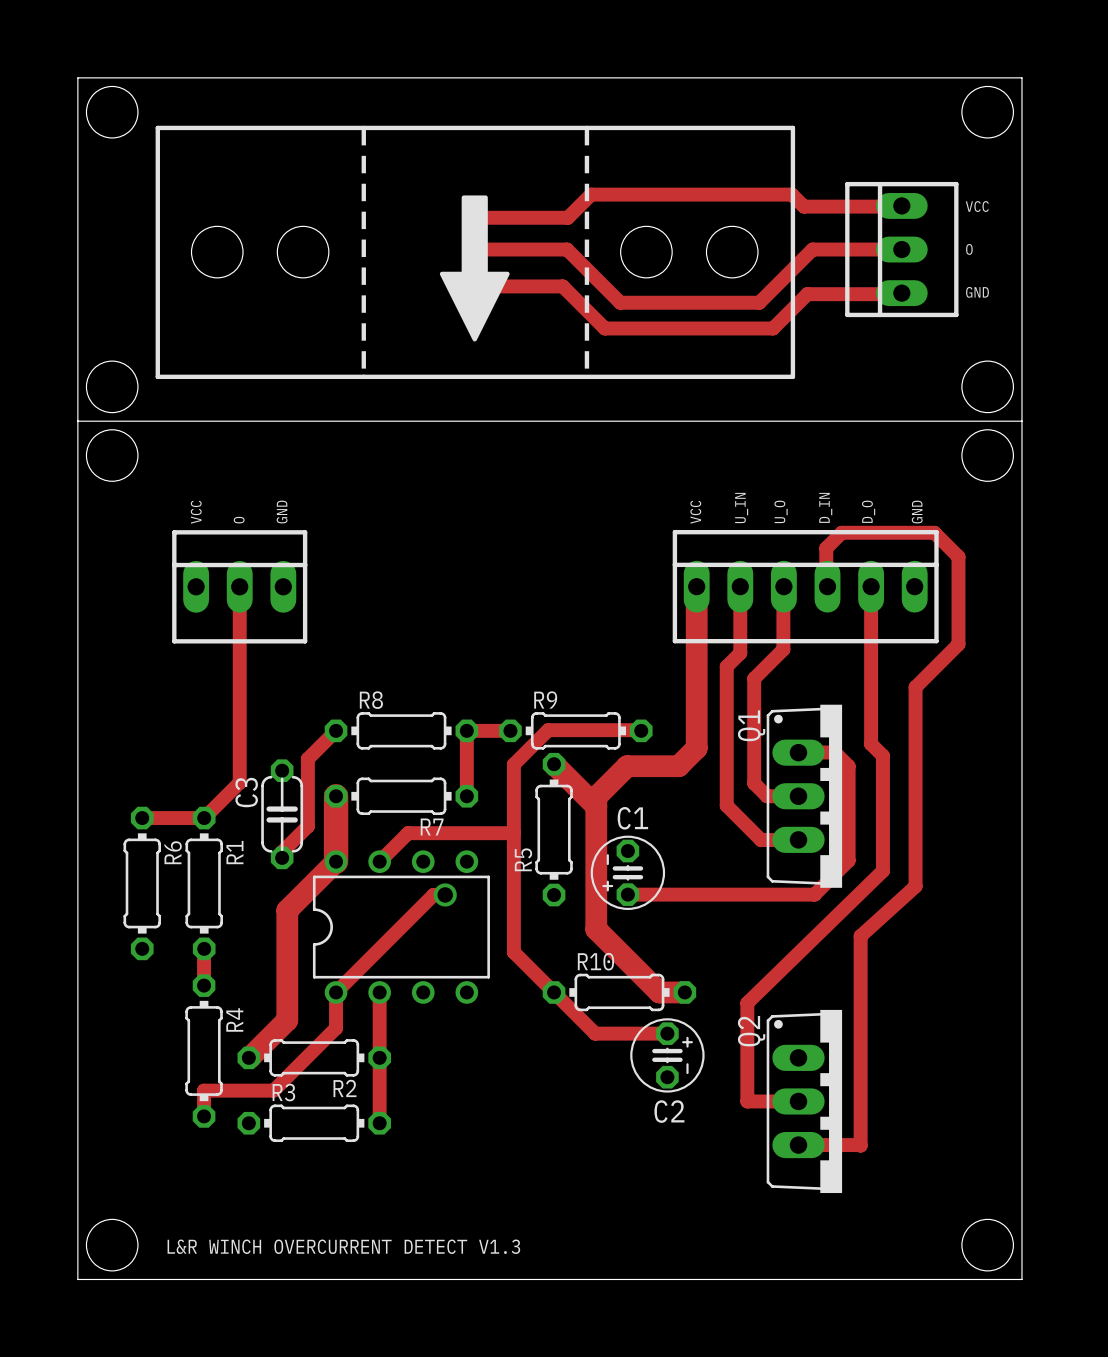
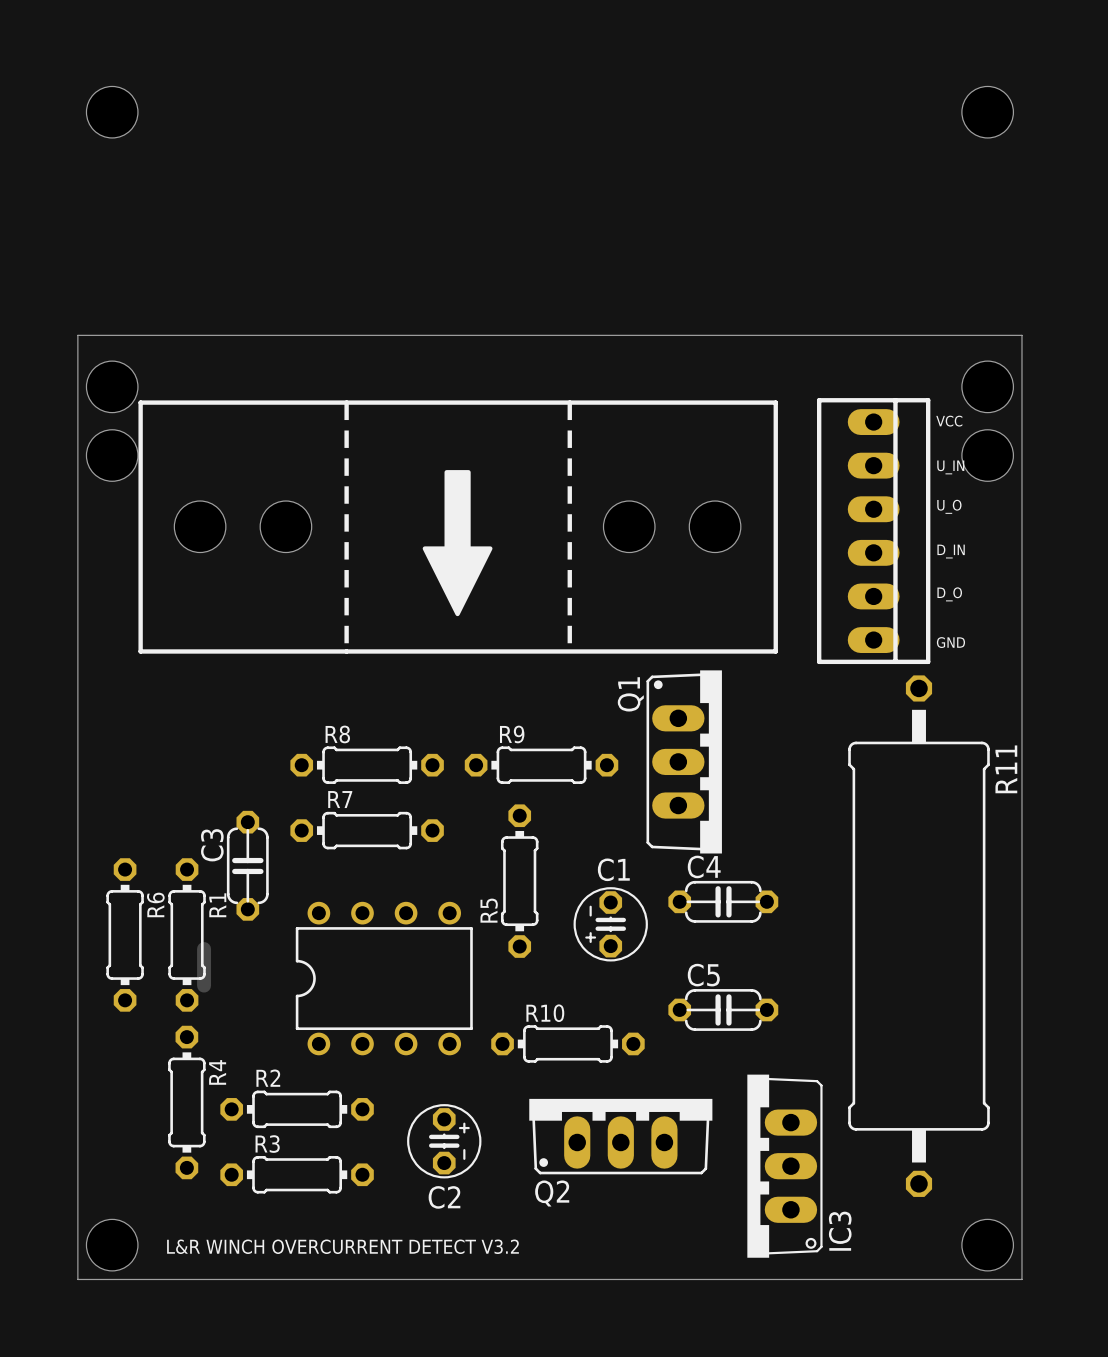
track: (901, 205) (803, 206) (791, 194) (591, 194) (567, 217) (474, 217) -> none
text: VCC (977, 206) -> none
track: (901, 249) (812, 249) (759, 302) (620, 302) (567, 249) (477, 249) (474, 252) -> none
part: (901, 249) -> none
text: O (969, 249) -> none
part position: (475, 252) -> (458, 527)
track: (474, 286) (562, 286) (604, 328) (773, 328) (807, 294) (901, 293) -> none
text: GND (977, 292) -> none
board edge: (77, 335) (77, 77) (1021, 77) (1021, 335) -> (77, 335) (1021, 335)
board edge: (77, 421) (1021, 421) -> none
text: none -> VCC (949, 421)
text rotation: 0° (741, 507) -> 90° clockwise (950, 467)
text position: U_IN (741, 507) -> U_IN (950, 467)
text rotation: 0° (825, 507) -> 90° clockwise (951, 551)
text position: D_IN (825, 507) -> D_IN (951, 551)
text rotation: 0° (781, 511) -> 90° clockwise (949, 506)
text position: U_O (781, 511) -> U_O (949, 506)
text rotation: 0° (868, 511) -> 90° clockwise (949, 594)
text position: D_O (868, 511) -> D_O (949, 594)
text: VCC (196, 512) -> none
text: GND (282, 512) -> none
text: VCC (695, 512) -> none
text rotation: 0° (917, 512) -> 90° clockwise (950, 642)
text position: GND (917, 512) -> GND (950, 642)
text: O (239, 520) -> none
track: (239, 586) (239, 782) (204, 818) (142, 818) -> none
part: (239, 586) -> none
track: (696, 586) (696, 748) (678, 766) (627, 766) (596, 797) (596, 929) (659, 992) (684, 992) -> none
track: (740, 586) (740, 653) (726, 666) (726, 805) (761, 840) (798, 840) -> none
track: (783, 586) (783, 649) (754, 678) (754, 783) (767, 796) (798, 796) -> none
part rotation: 0° (805, 586) -> 90° clockwise (873, 531)
track: (827, 586) (826, 548) (841, 532) (934, 532) (958, 556) (958, 644) (915, 687) (915, 886) (860, 936) (860, 1145) (798, 1145) -> none
track: (871, 586) (871, 744) (882, 755) (882, 870) (747, 1003) (747, 1101) (798, 1101) -> none
track: (336, 730) (307, 759) (307, 826) (282, 852) (282, 857) -> none
R8 position: (401, 730) -> (367, 765)
track: (510, 730) (466, 730) (466, 796) -> none
R9 position: (575, 730) -> (541, 765)
track: (641, 730) (548, 730) (513, 764) (513, 952) (595, 1033) (667, 1033) -> none
track: (798, 752) (834, 752) (848, 766) (848, 860) (814, 894) (627, 894) -> none
track: (554, 764) (596, 806) -> none
track: (336, 796) (336, 861) (287, 910) (287, 1020) (248, 1057) -> none
R7 position: (401, 796) -> (367, 830)
Q1 position: (804, 796) -> (684, 761)
C3 position: (282, 814) -> (247, 865)
R7 name position: R7 (432, 827) -> R7 (340, 799)
R5 position: (554, 829) -> (519, 881)
track: (513, 833) (408, 833) (379, 861) -> none
C1 position: (627, 872) -> (610, 924)
R6 position: (142, 883) -> (125, 934)
R1 position: (204, 883) -> (187, 934)
track: (445, 894) (433, 894) (336, 992) (336, 1028) (273, 1090) (204, 1090) (204, 1116) -> none
via: (445, 894) -> none
C4: none -> (723, 901)
part position: (401, 927) -> (384, 978)
R11: none -> (918, 936)
track: (379, 992) (379, 1123) -> none
R10 position: (619, 992) -> (567, 1043)
C5: none -> (723, 1009)
R4 position: (204, 1051) -> (186, 1102)
C2 position: (667, 1055) -> (444, 1141)
R2 position: (314, 1057) -> (297, 1109)
R2 name position: R2 (344, 1088) -> R2 (268, 1078)
Q2 rotation: 0° (804, 1101) -> 90° counterclockwise (620, 1136)
Q2 position: (804, 1101) -> (620, 1136)
R3 position: (314, 1123) -> (297, 1174)
IC3: none -> (784, 1166)
text: L&R WINCH OVERCURRENT DETECT V1.3 (343, 1246) -> L&R WINCH OVERCURRENT DETECT V3.2 (342, 1246)

